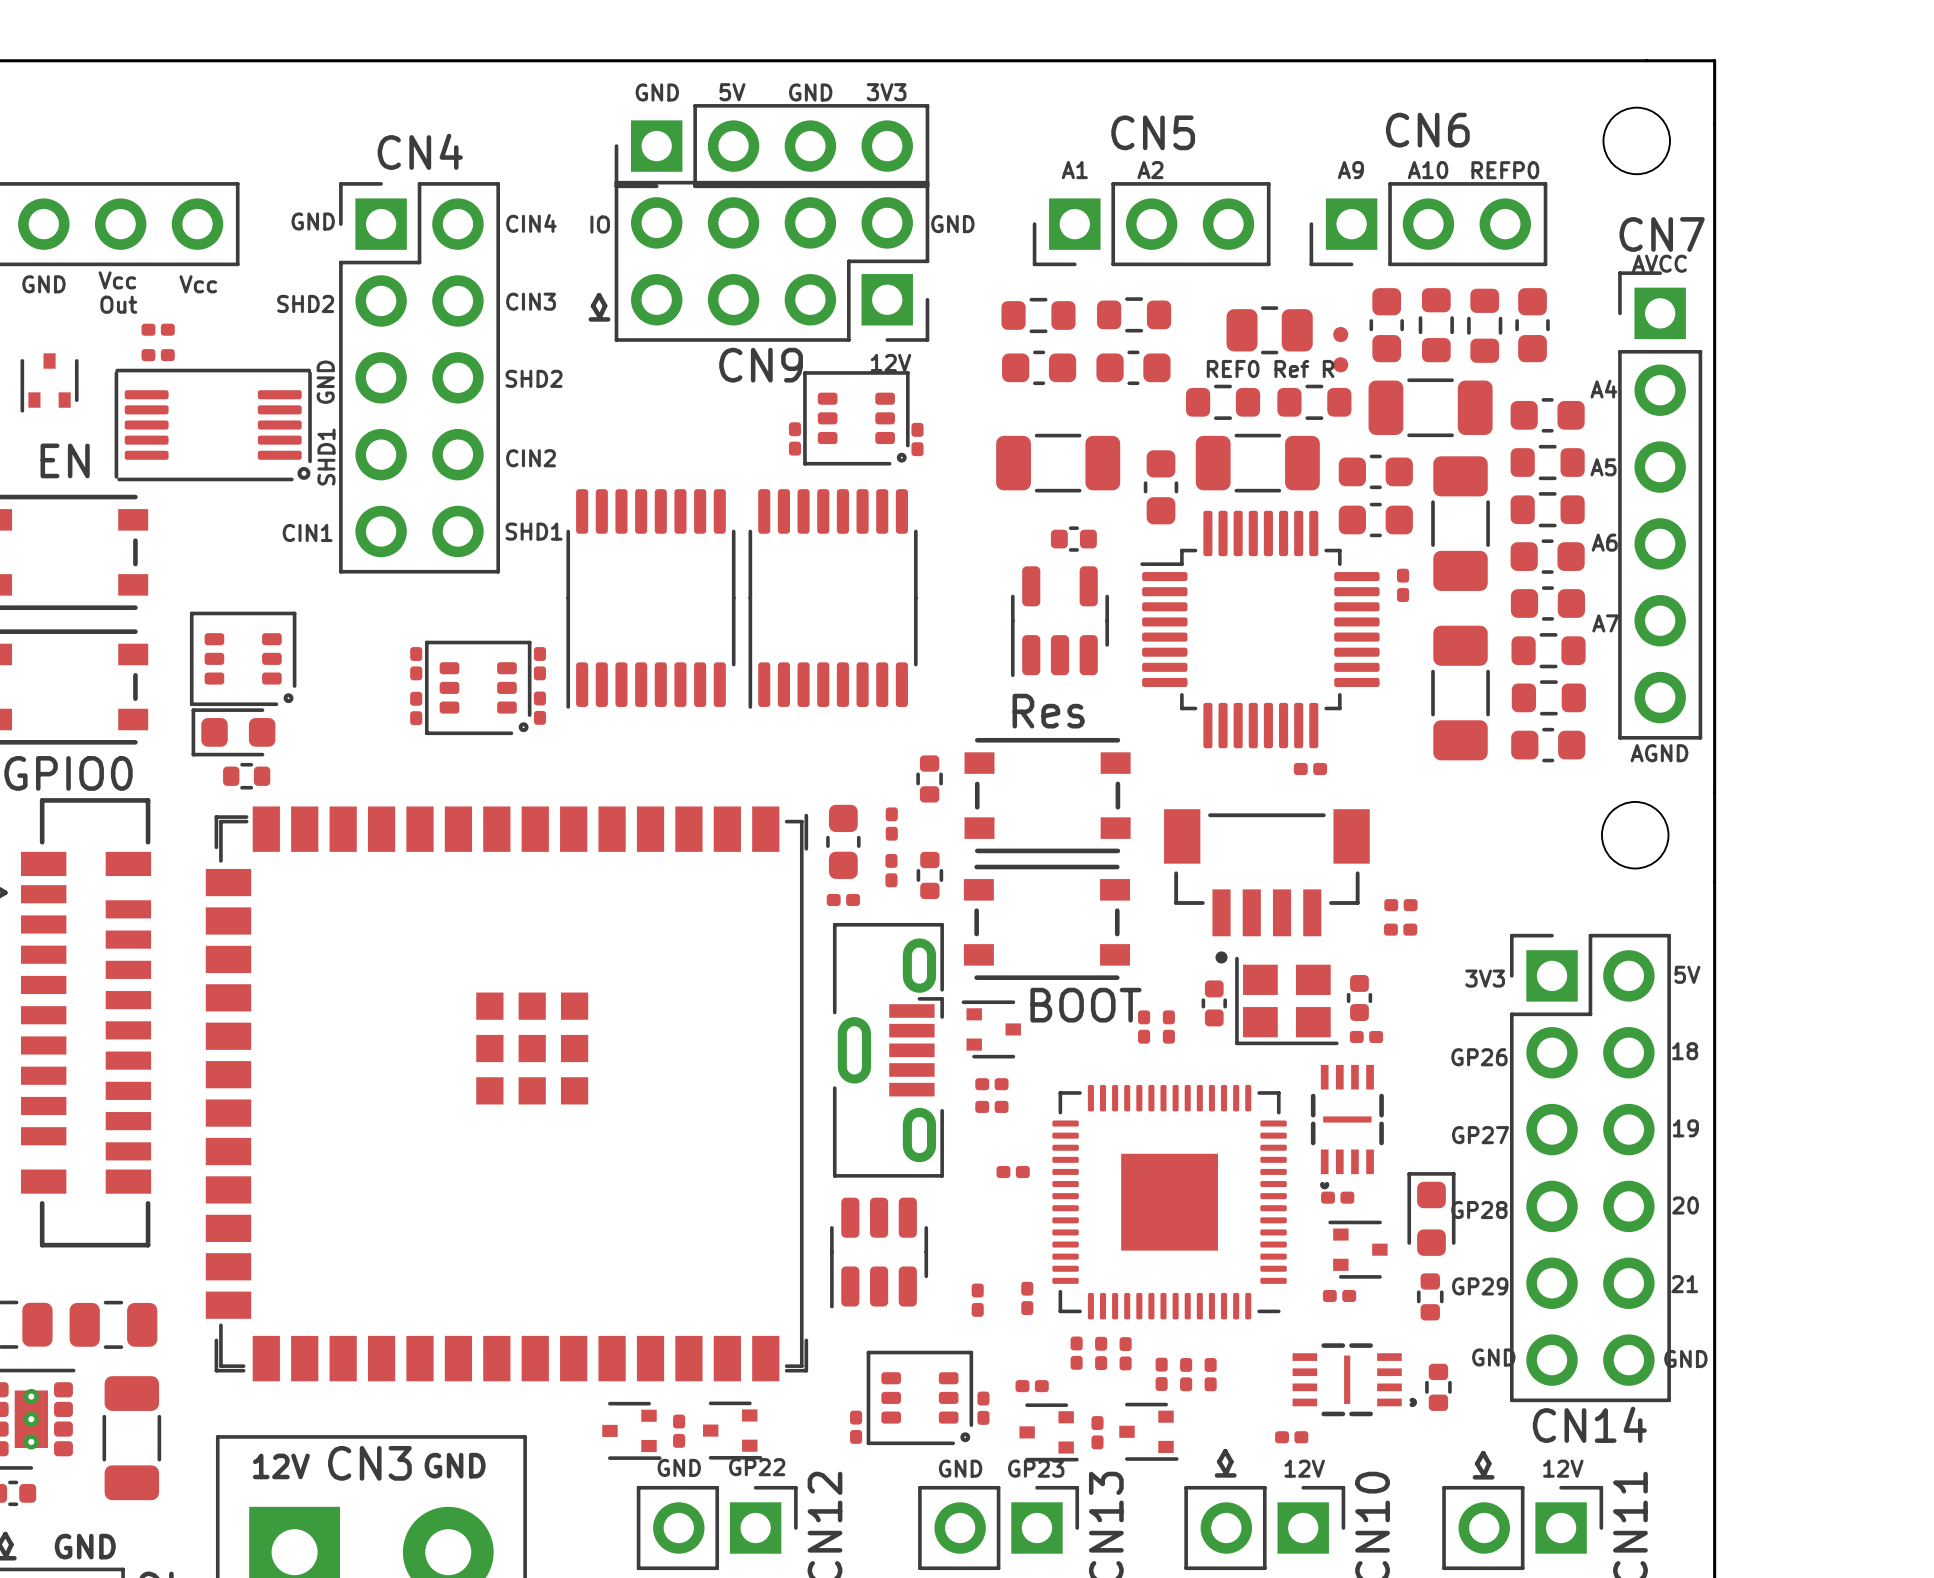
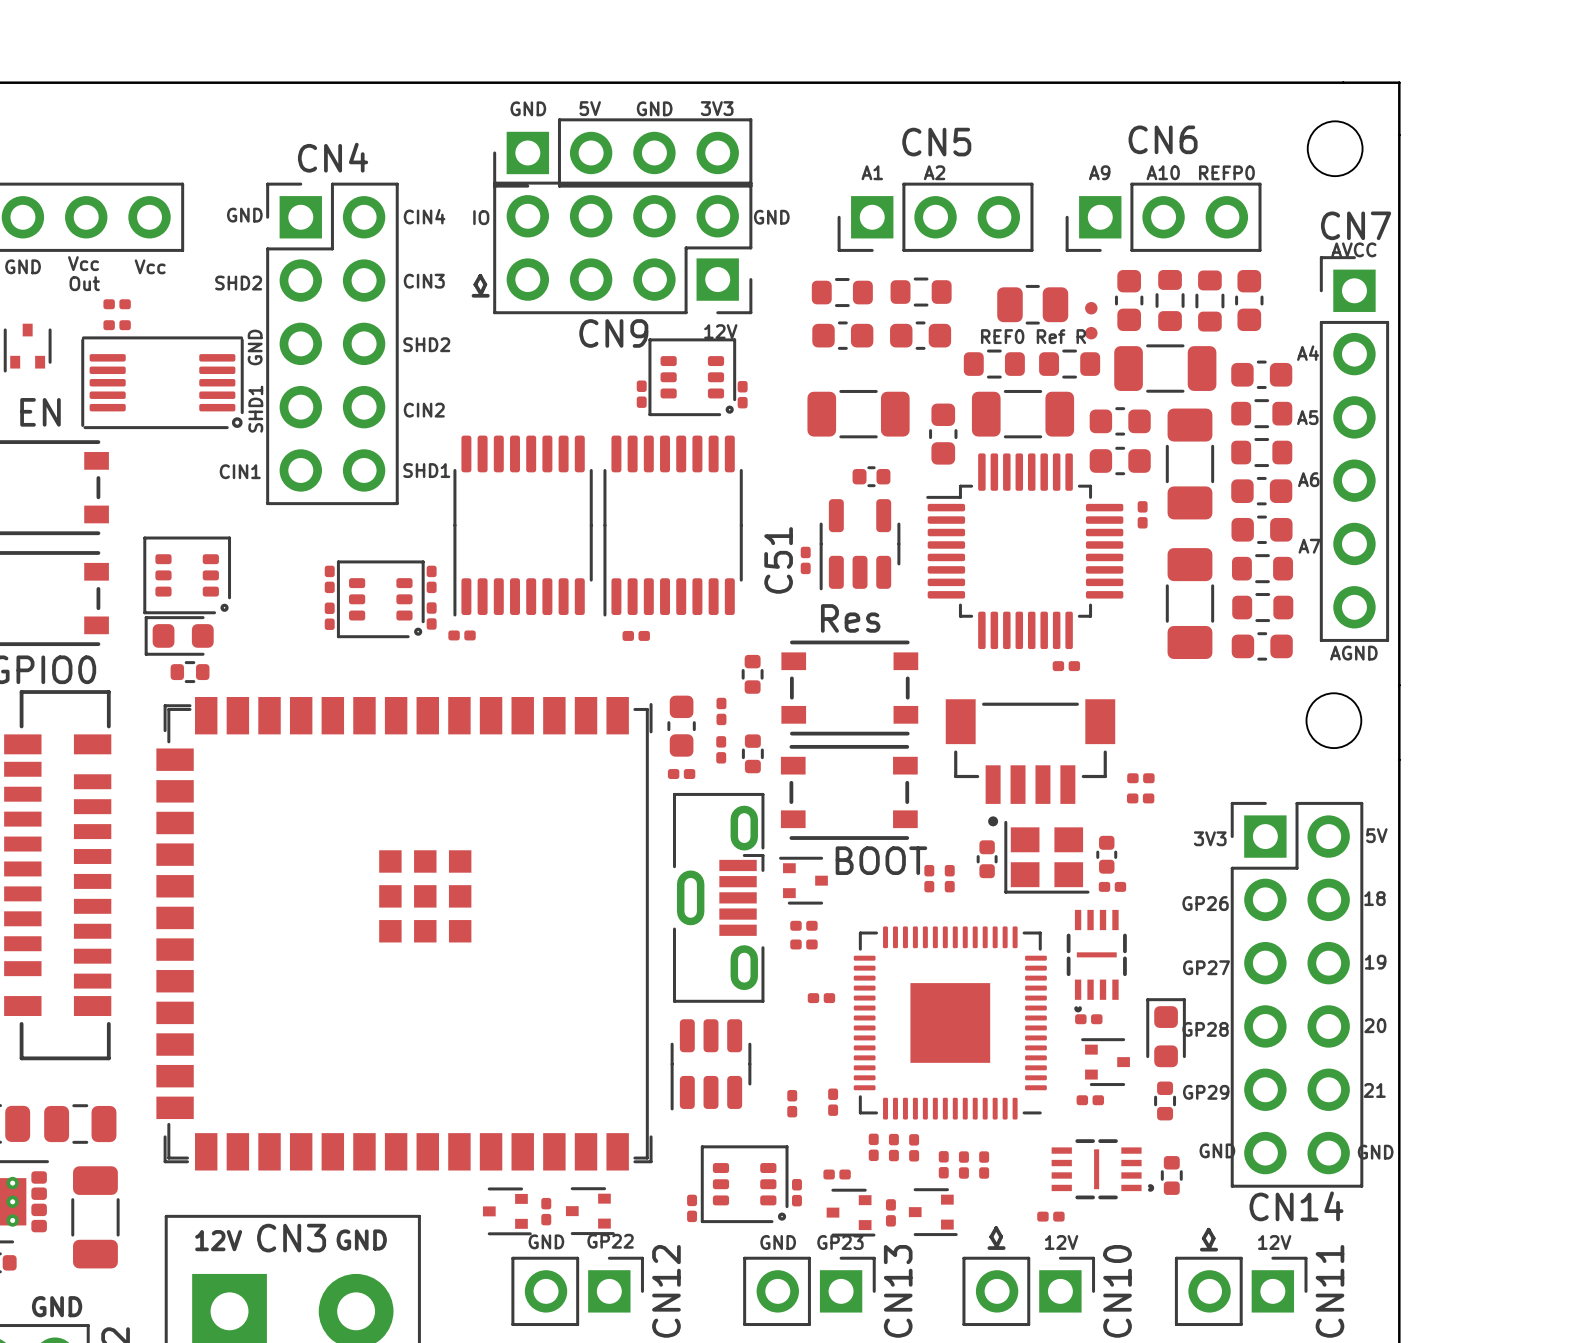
C51: none -> (805, 560)
part: none -> (462, 635)
part: none -> (636, 635)

